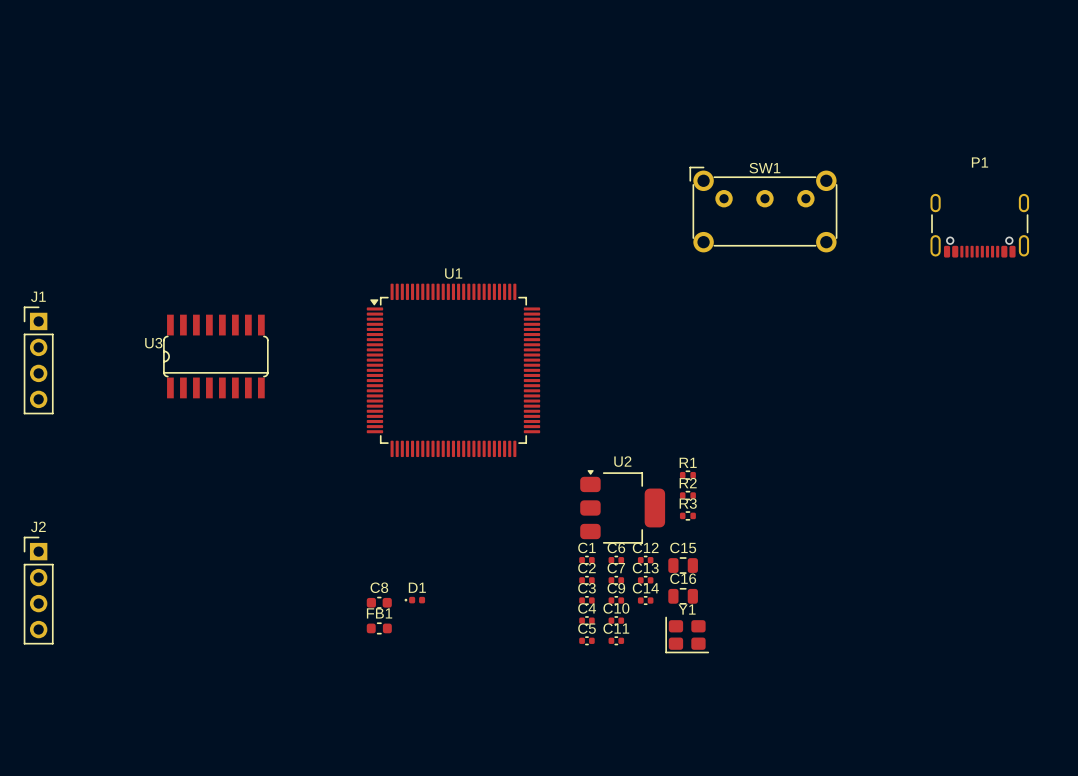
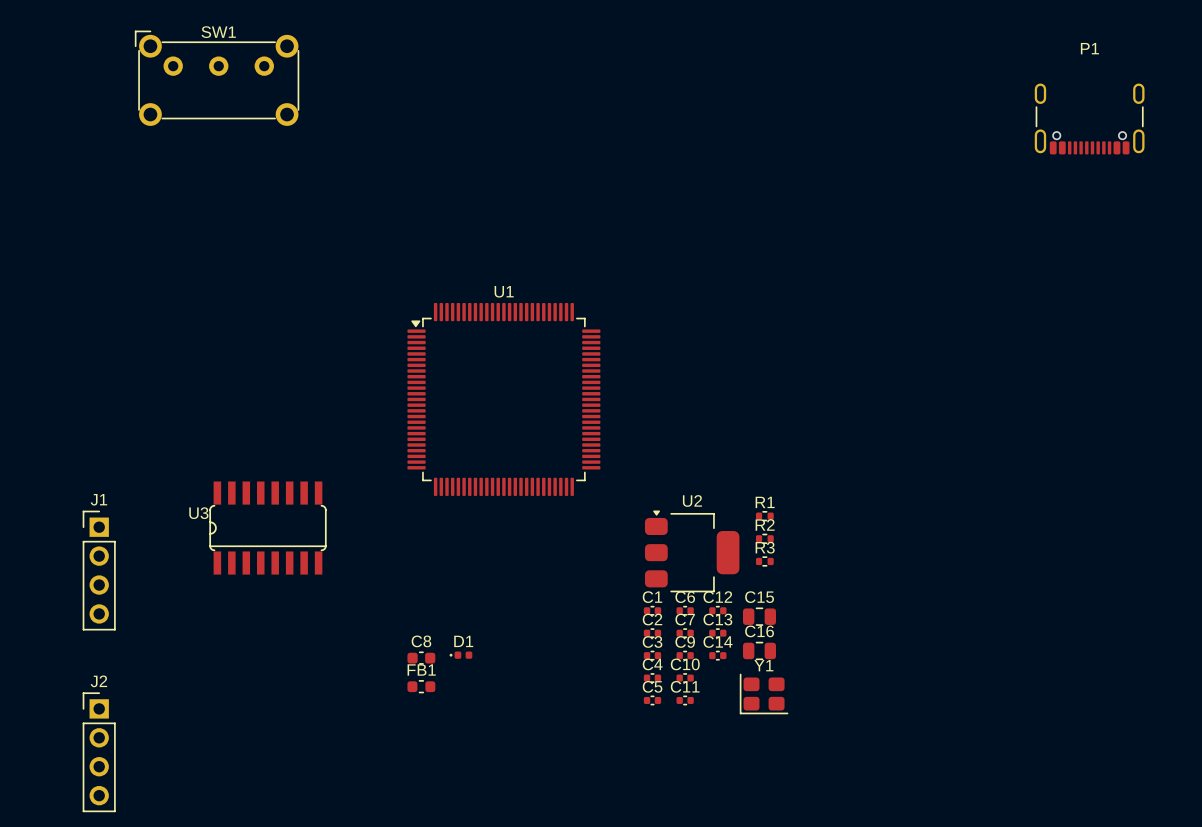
SW1 position: (763, 209) -> (217, 78)
P1 position: (979, 225) -> (1089, 118)
U3 position: (215, 356) -> (267, 528)
J1 position: (38, 360) -> (99, 570)
J2 position: (38, 590) -> (99, 752)

